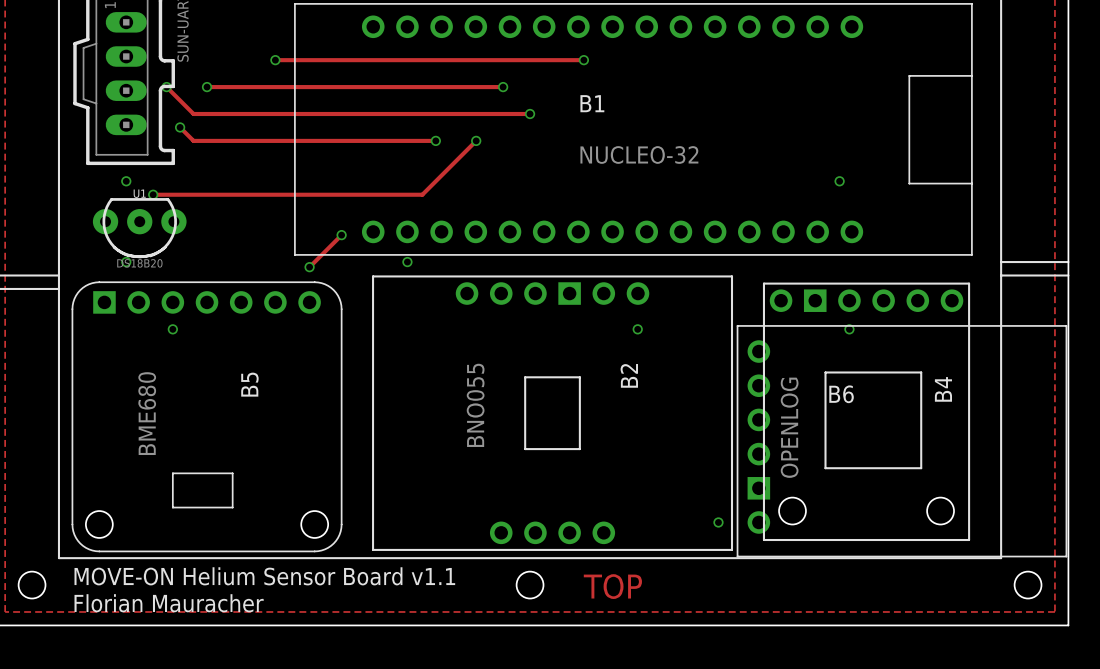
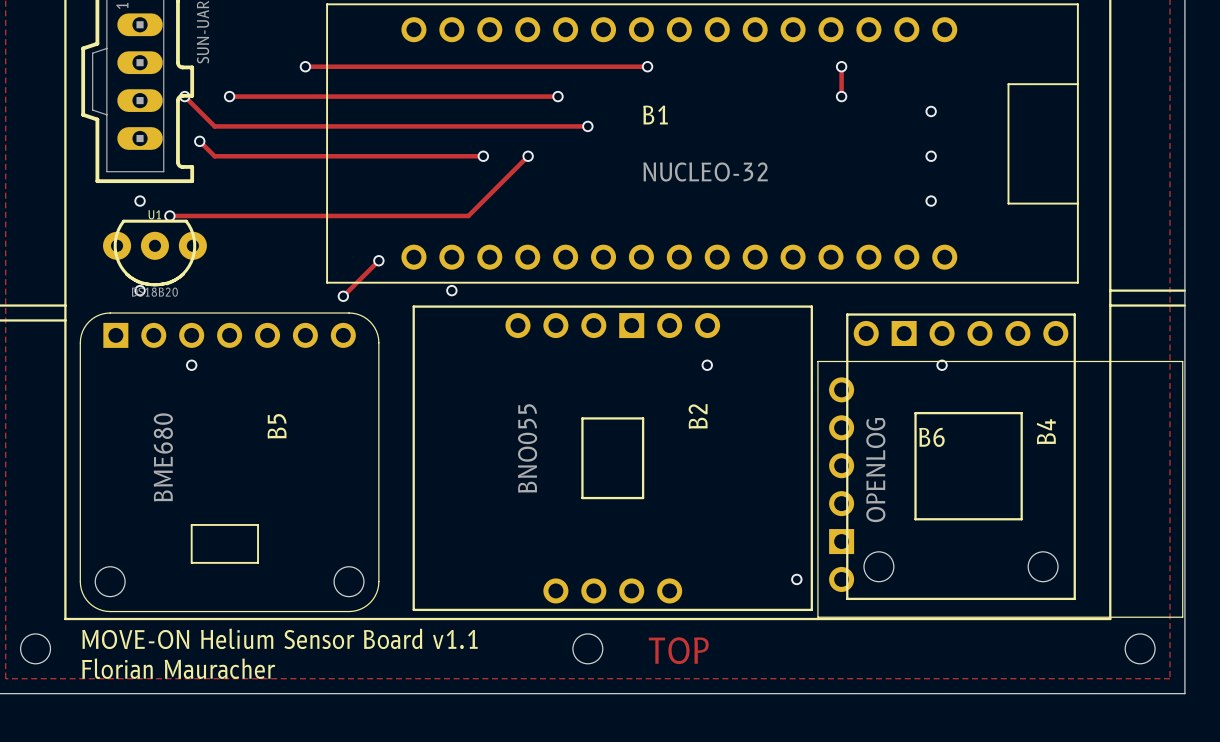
track: none -> (841, 66) (841, 96)
via: none -> (841, 66)
via: none -> (841, 96)
via: none -> (931, 111)
via: none -> (931, 156)

